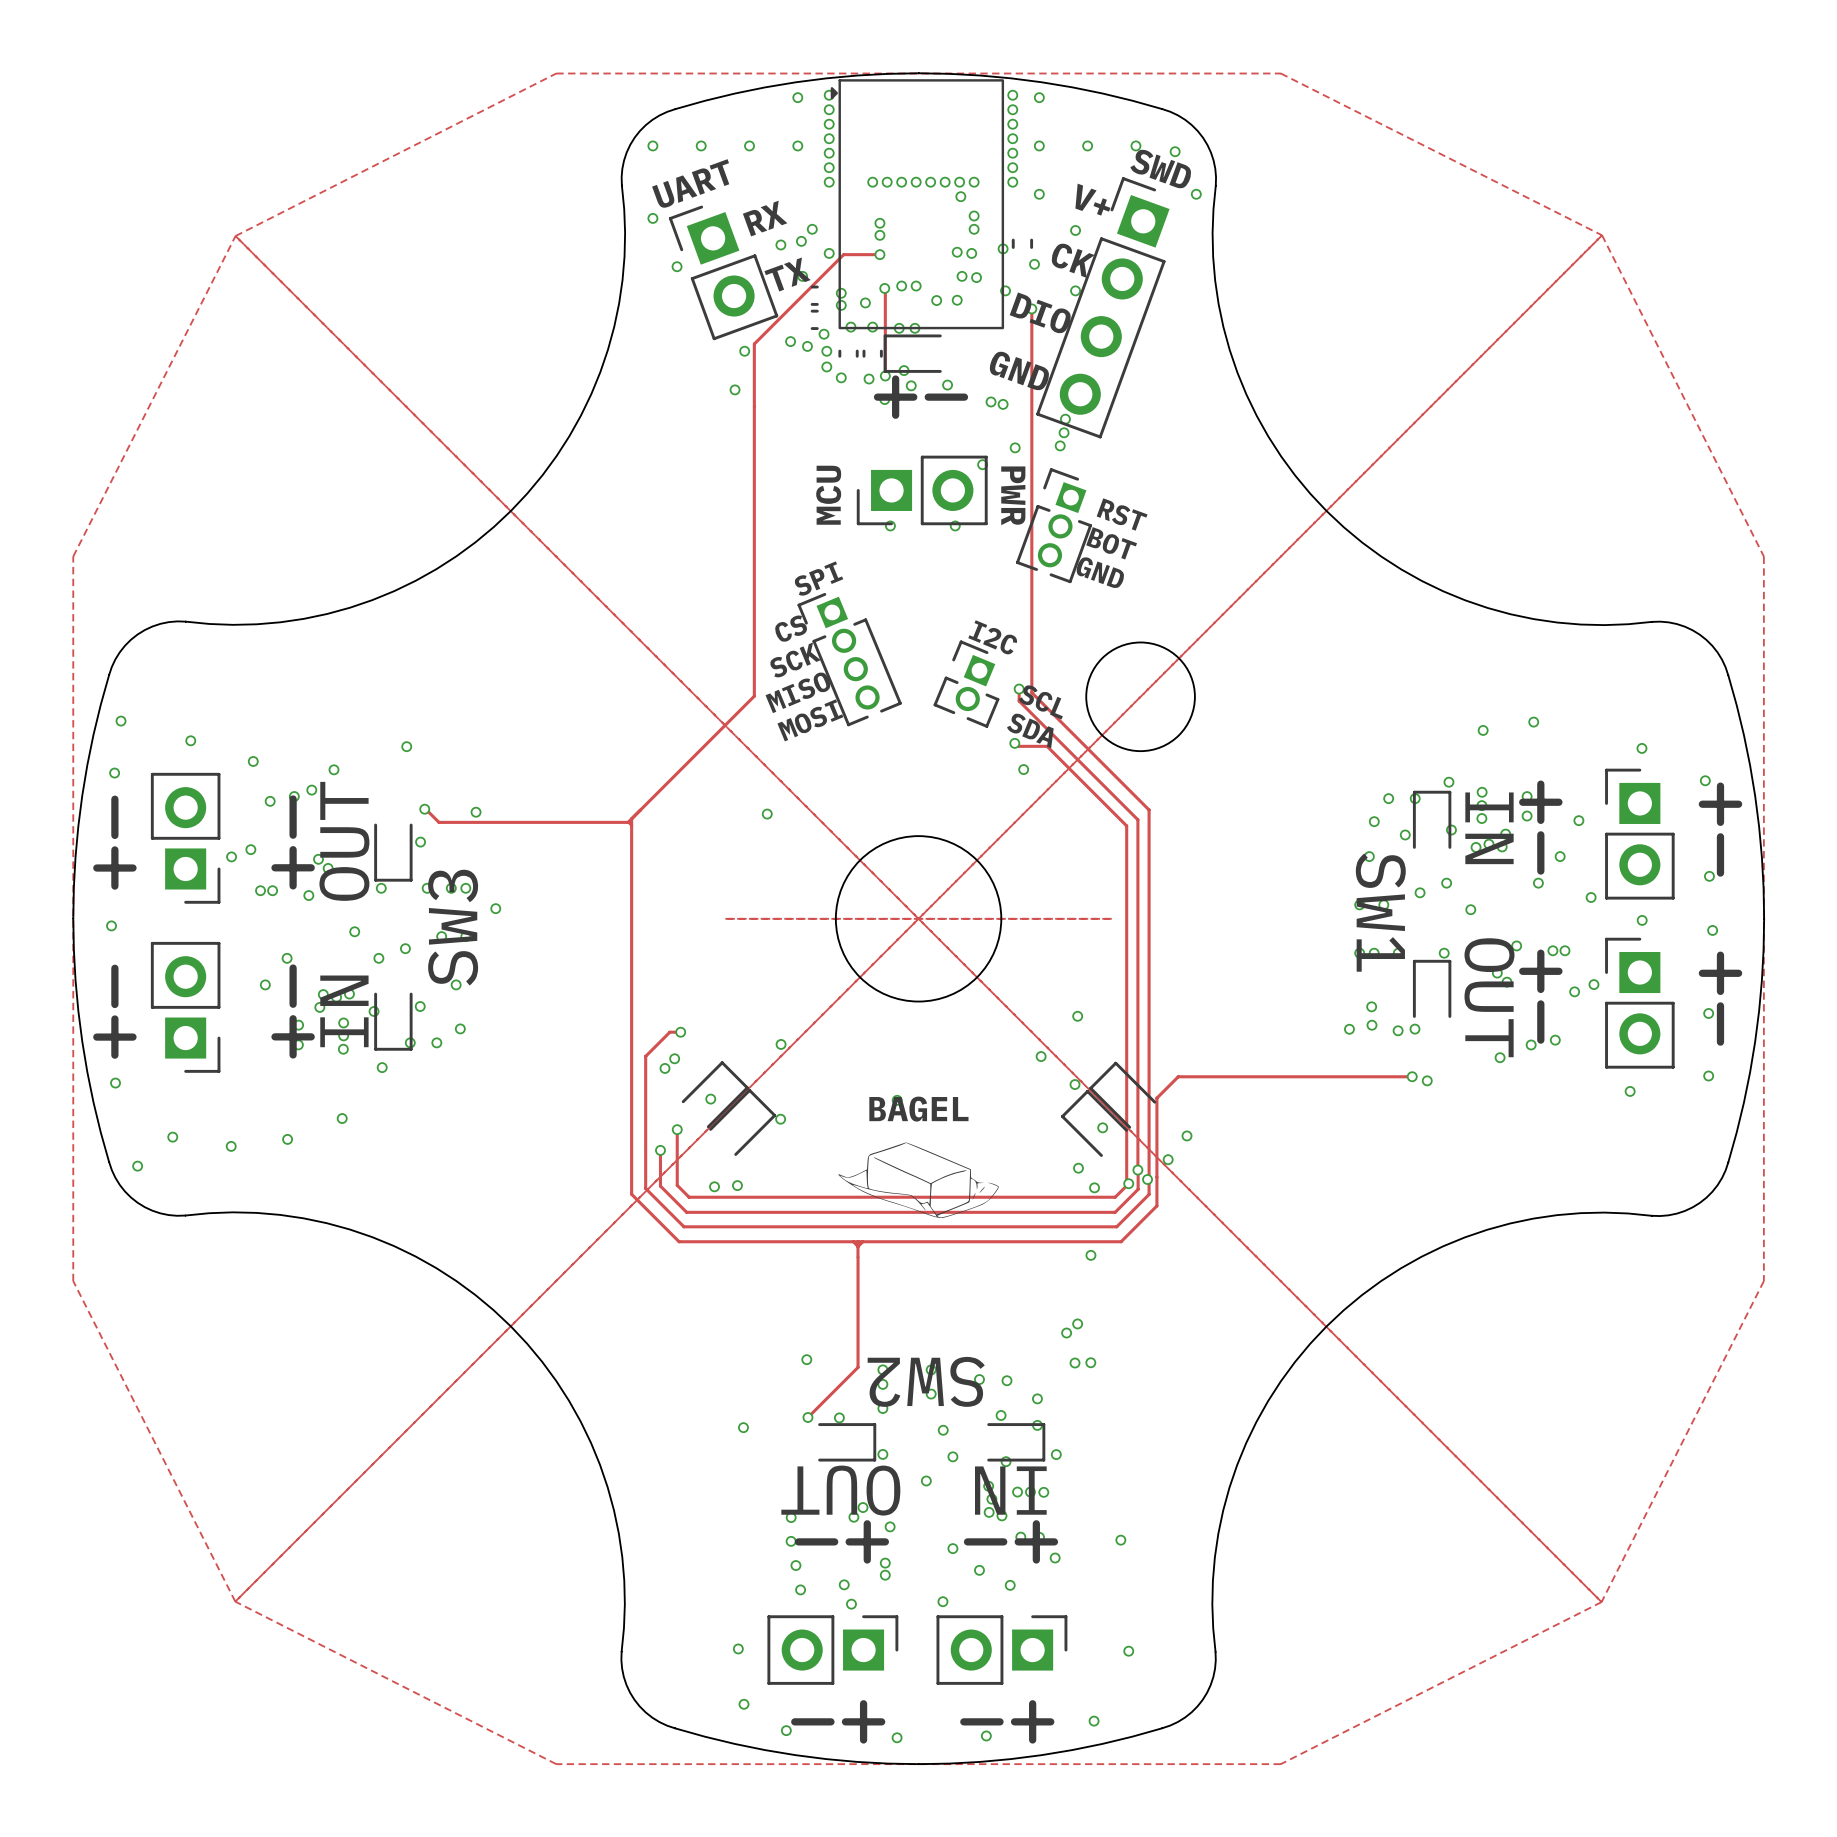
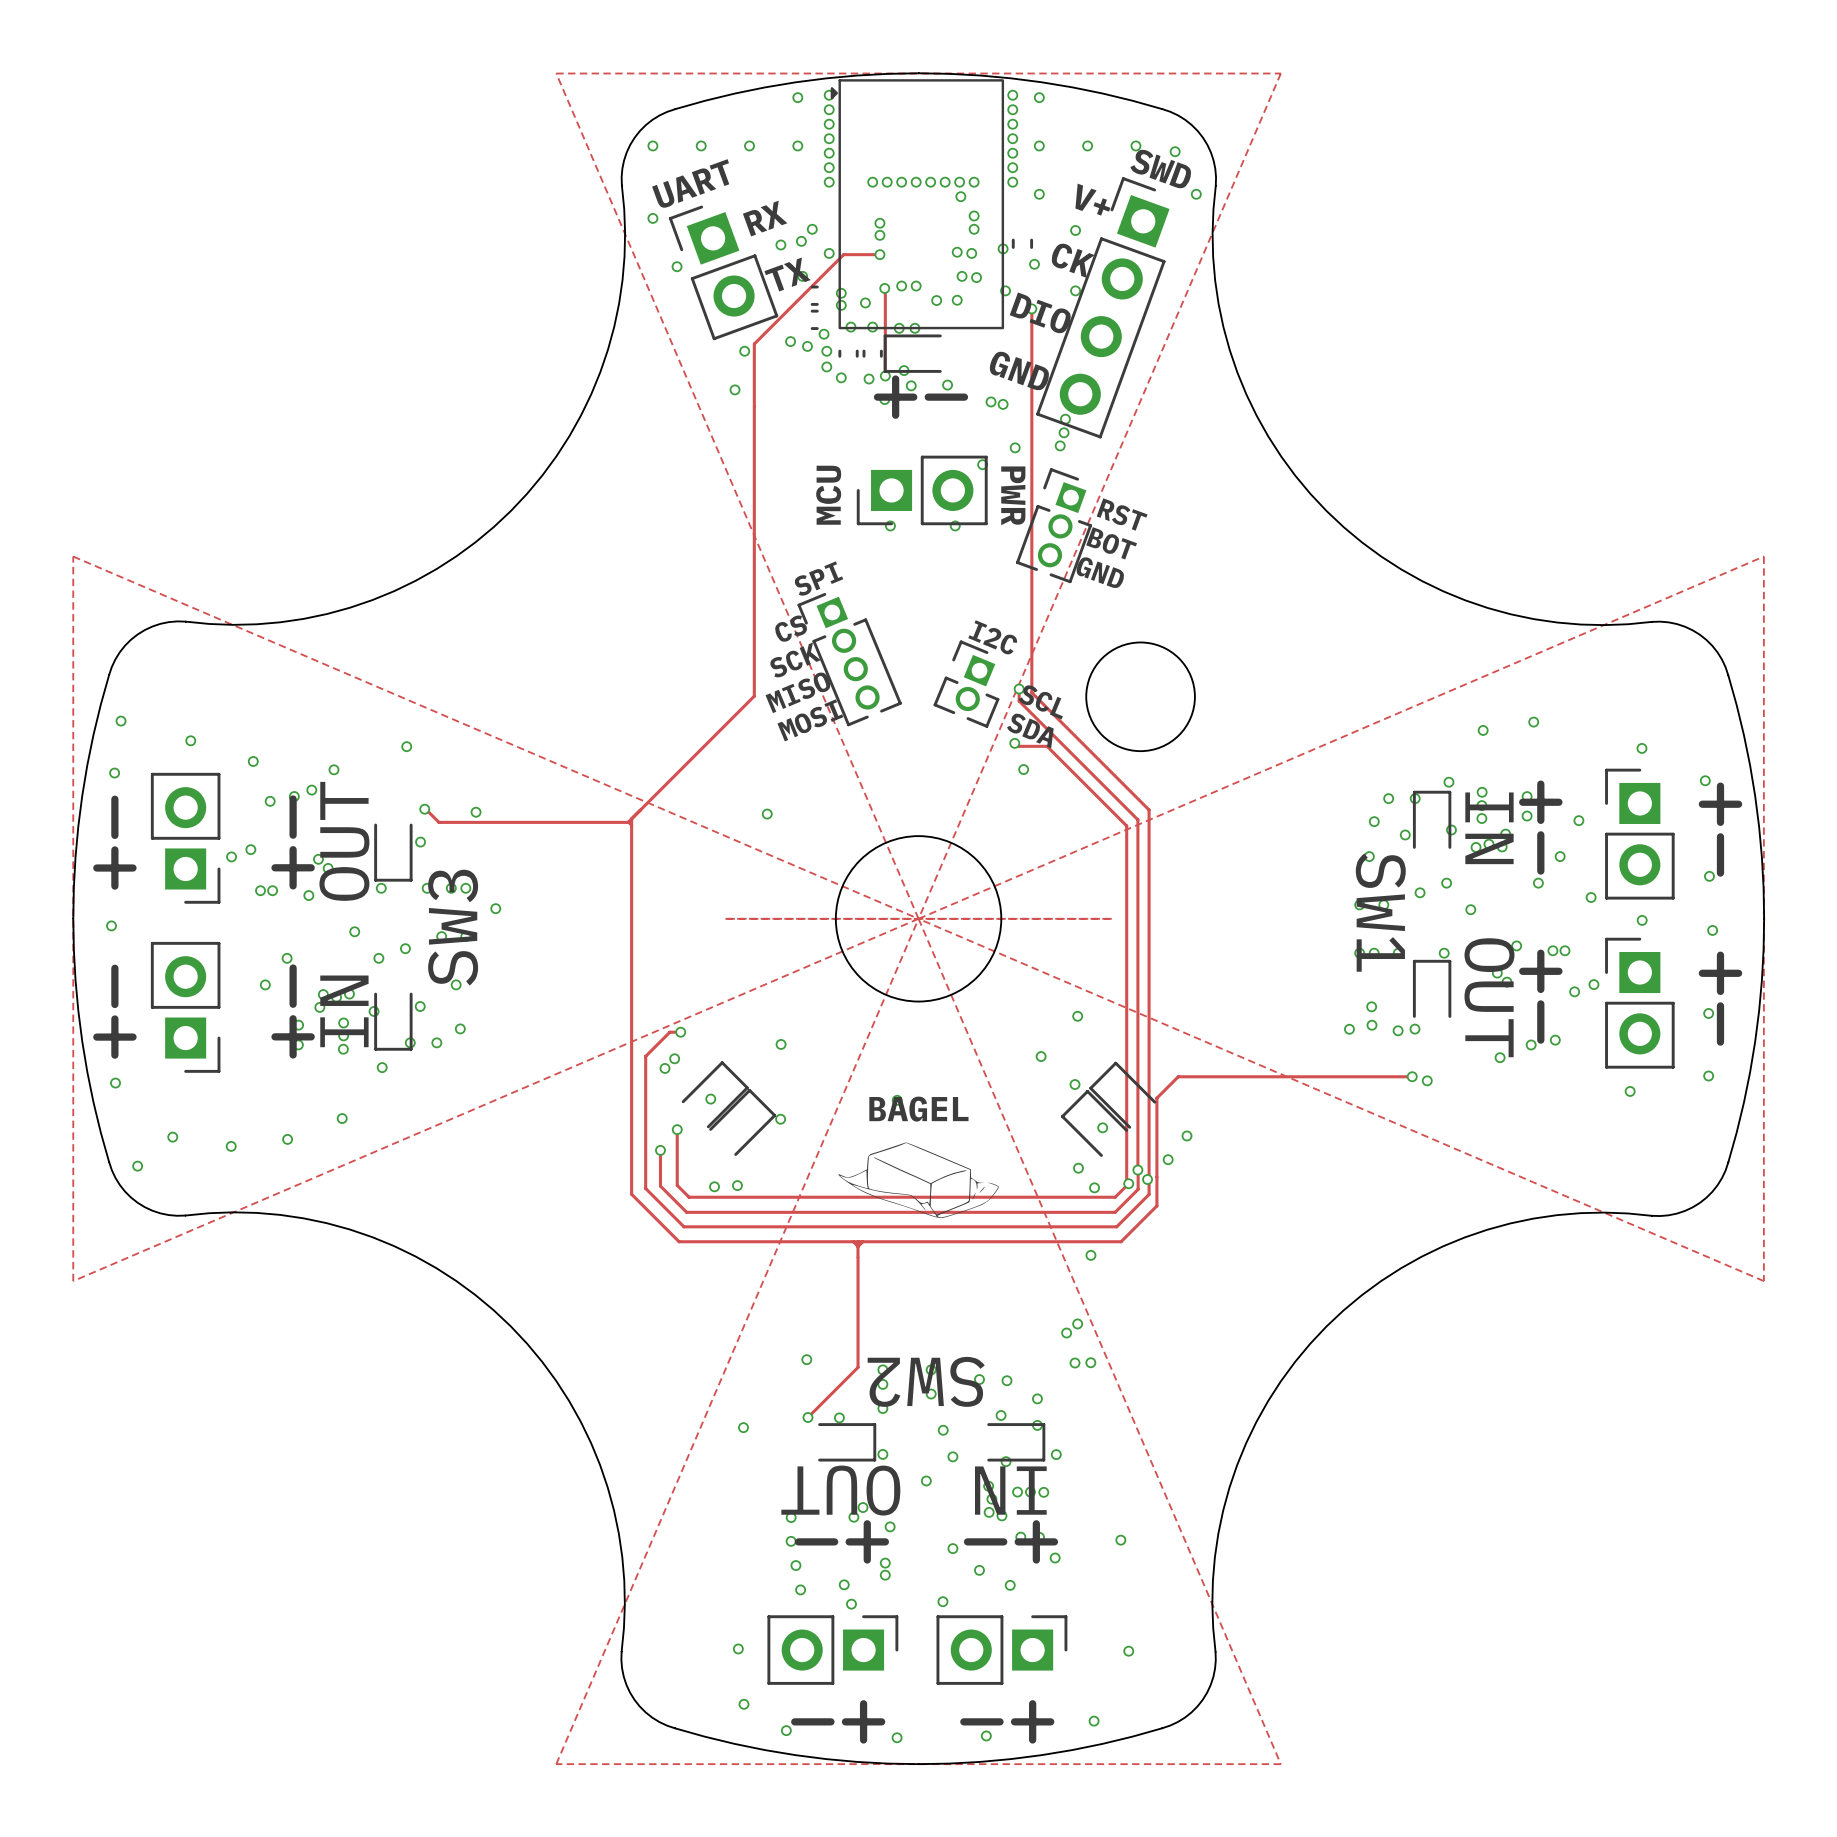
zone outline: (556, 73) (235, 236) -> (556, 73) (1280, 1764)
zone outline: (1280, 73) (1602, 235) -> none
zone outline: (1602, 235) (918, 918) -> none
zone outline: (1602, 235) (1763, 556) -> none
zone outline: (235, 236) (73, 556) -> (1763, 1281) (73, 556)
zone outline: (235, 236) (918, 918) -> none
zone outline: (918, 918) (235, 1601) -> none
zone outline: (918, 918) (1601, 1602) -> none
zone outline: (73, 1281) (235, 1601) -> (73, 1281) (1763, 556)
zone outline: (1763, 1281) (1601, 1602) -> none
zone outline: (235, 1601) (556, 1764) -> (1280, 73) (556, 1764)
zone outline: (1601, 1602) (1280, 1764) -> none

